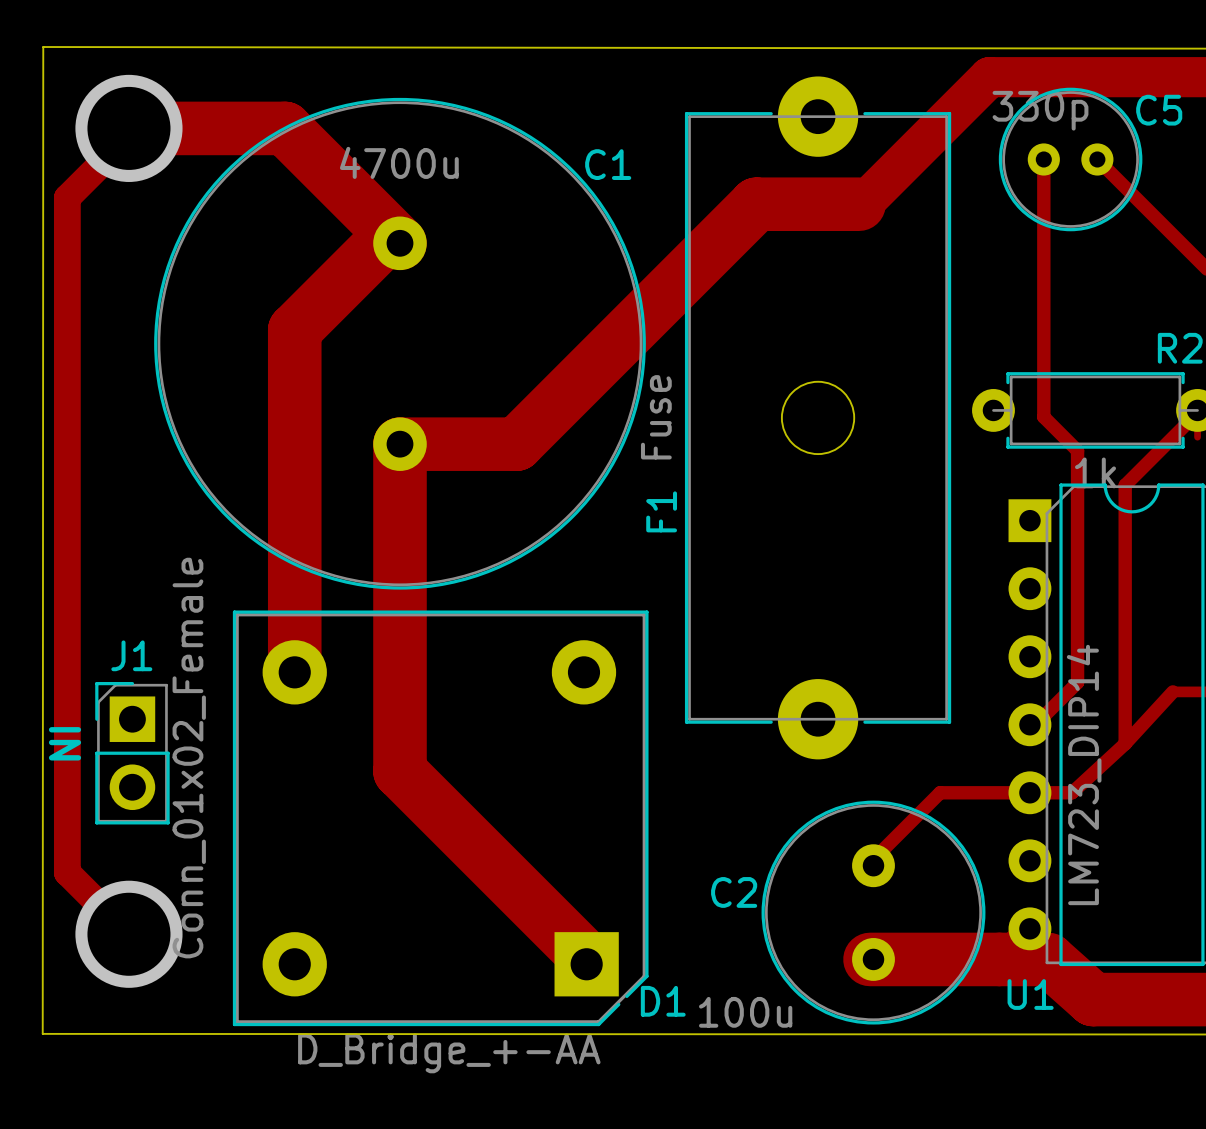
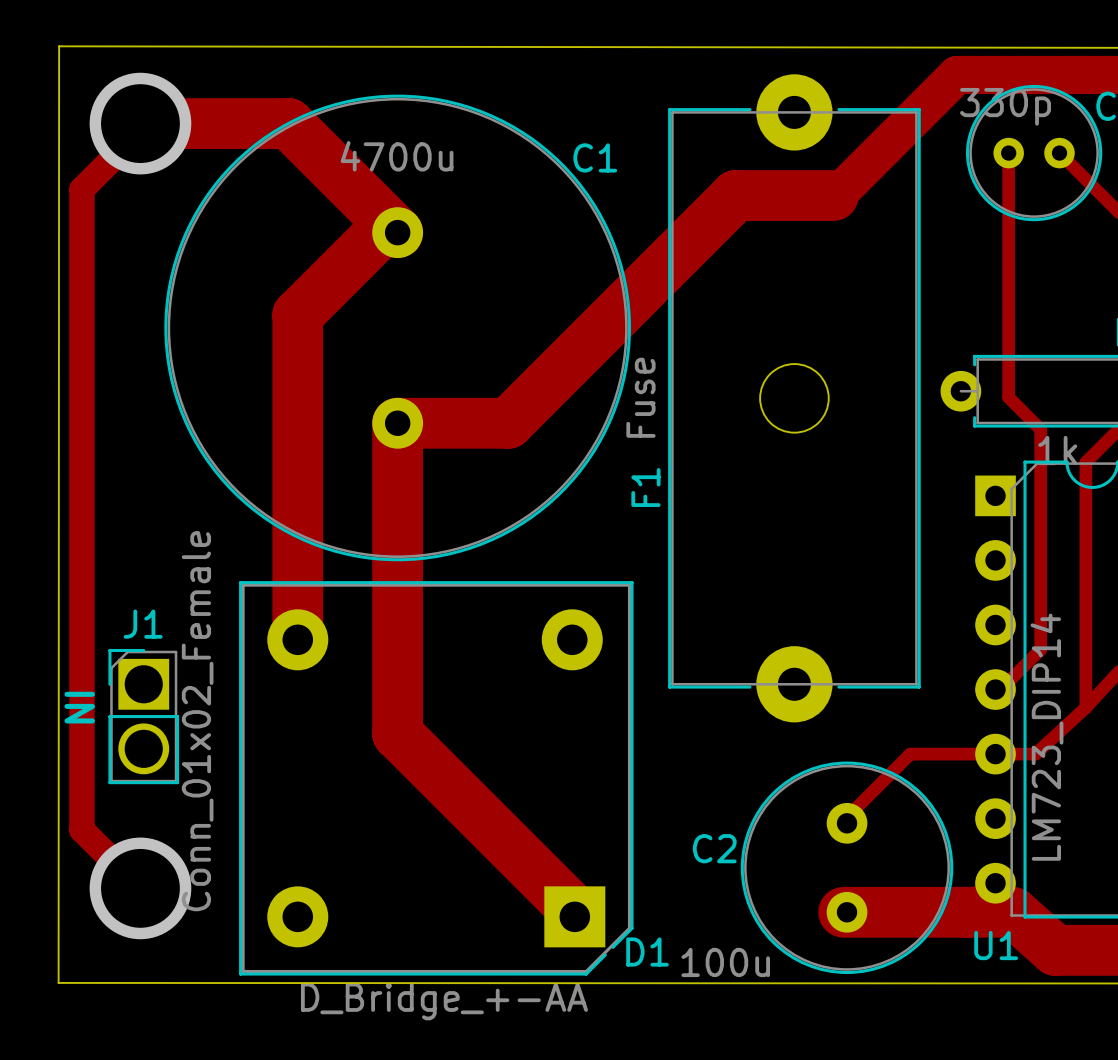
J1 footprint: [95, 681, 170, 825] -> [108, 648, 180, 785]

